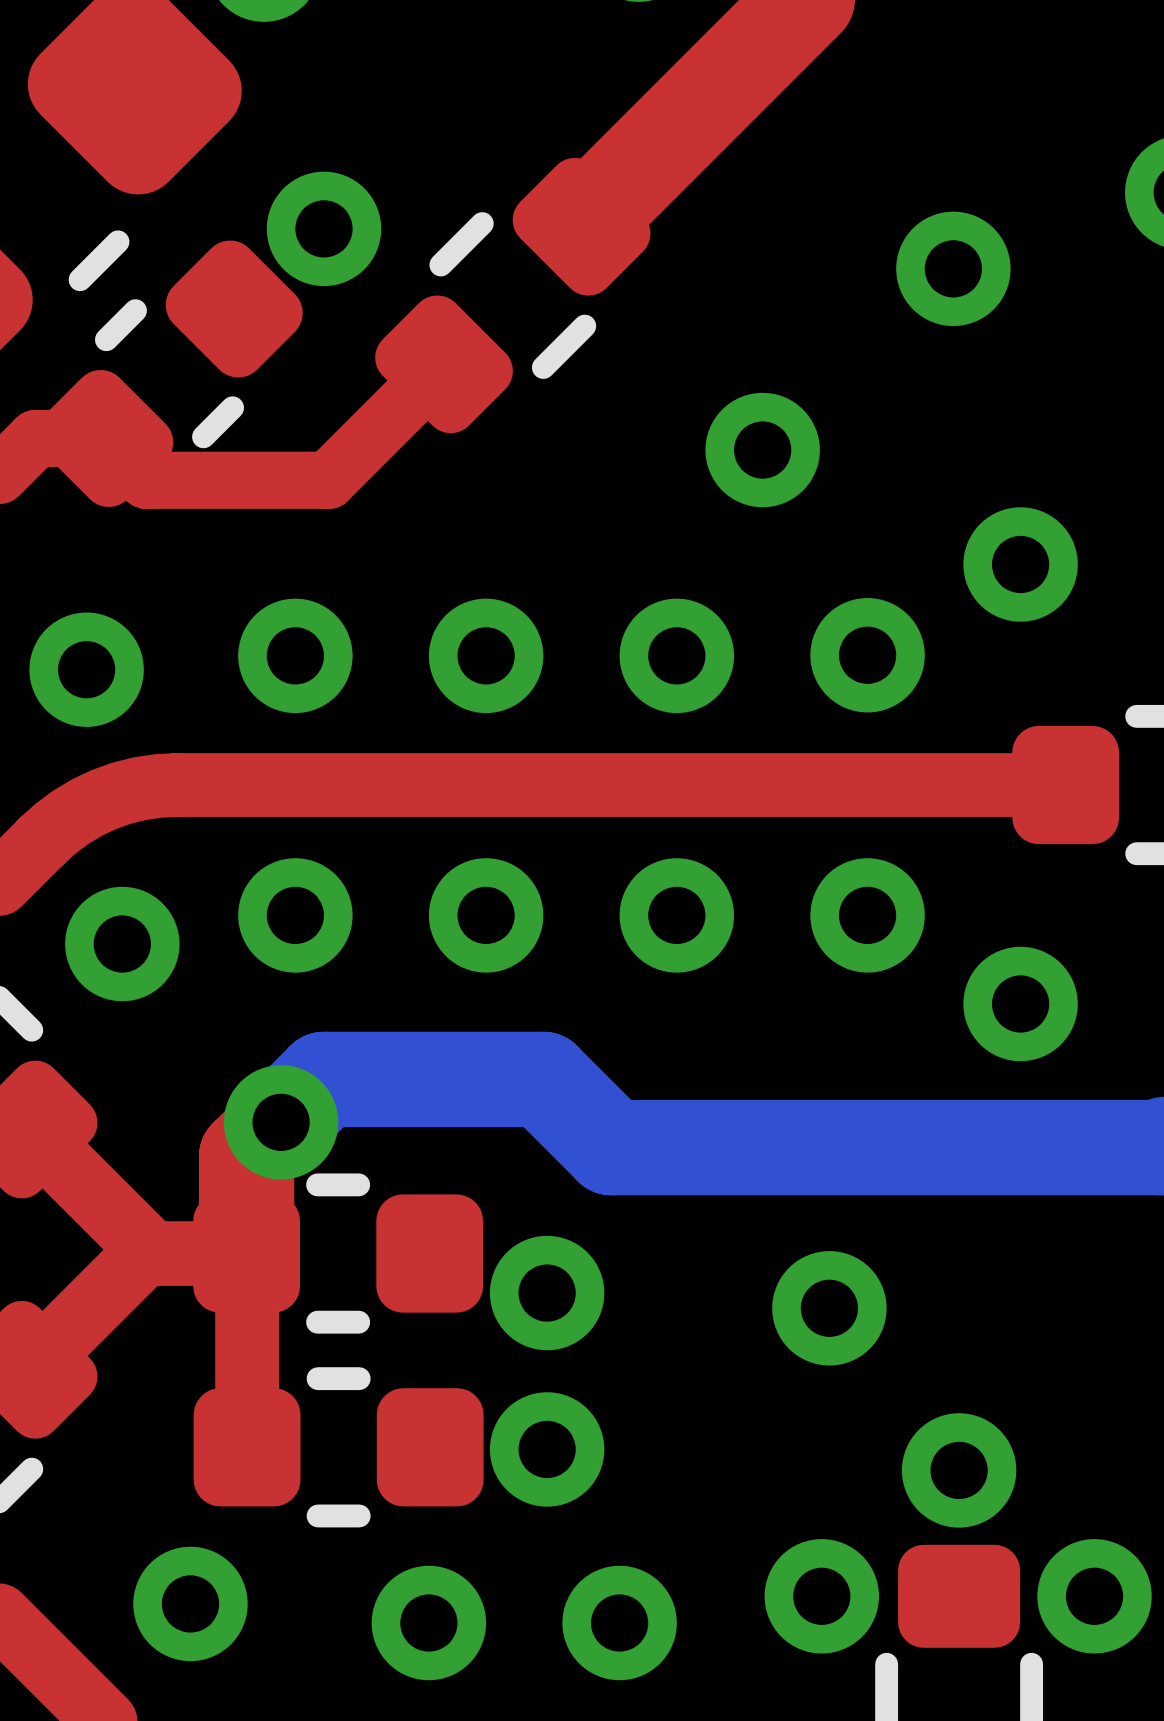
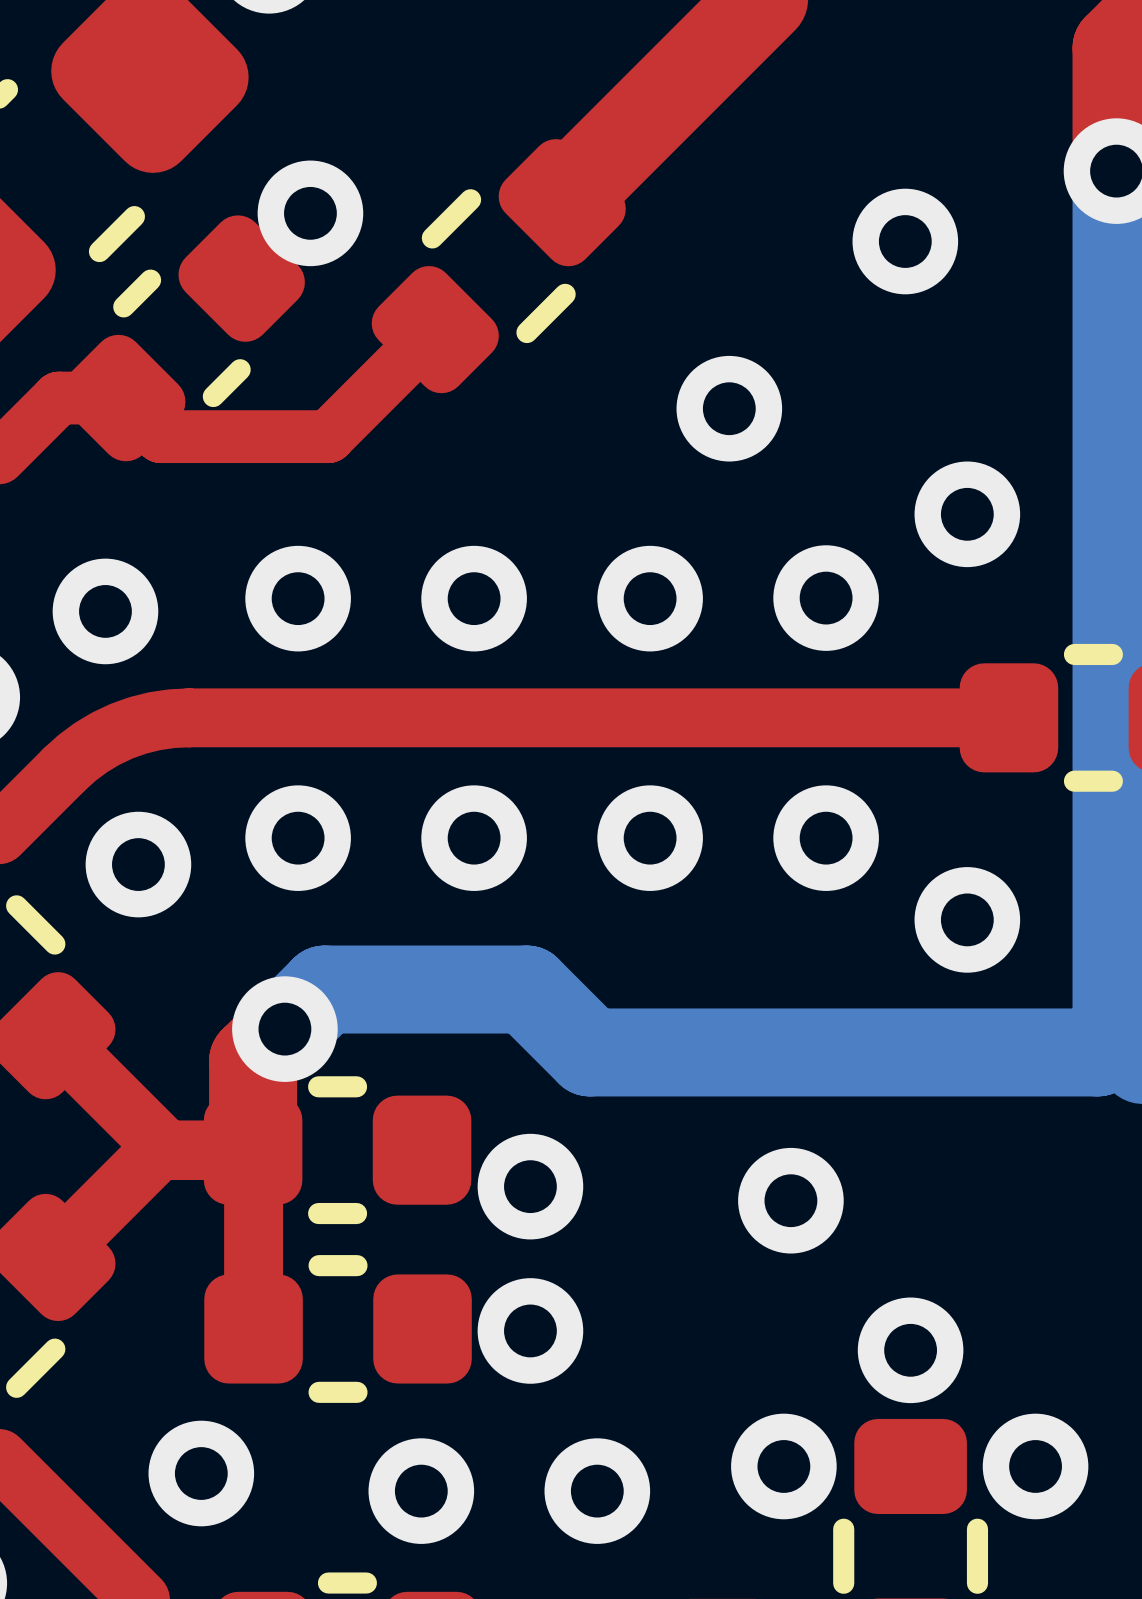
via position: (323, 228) -> (310, 213)

